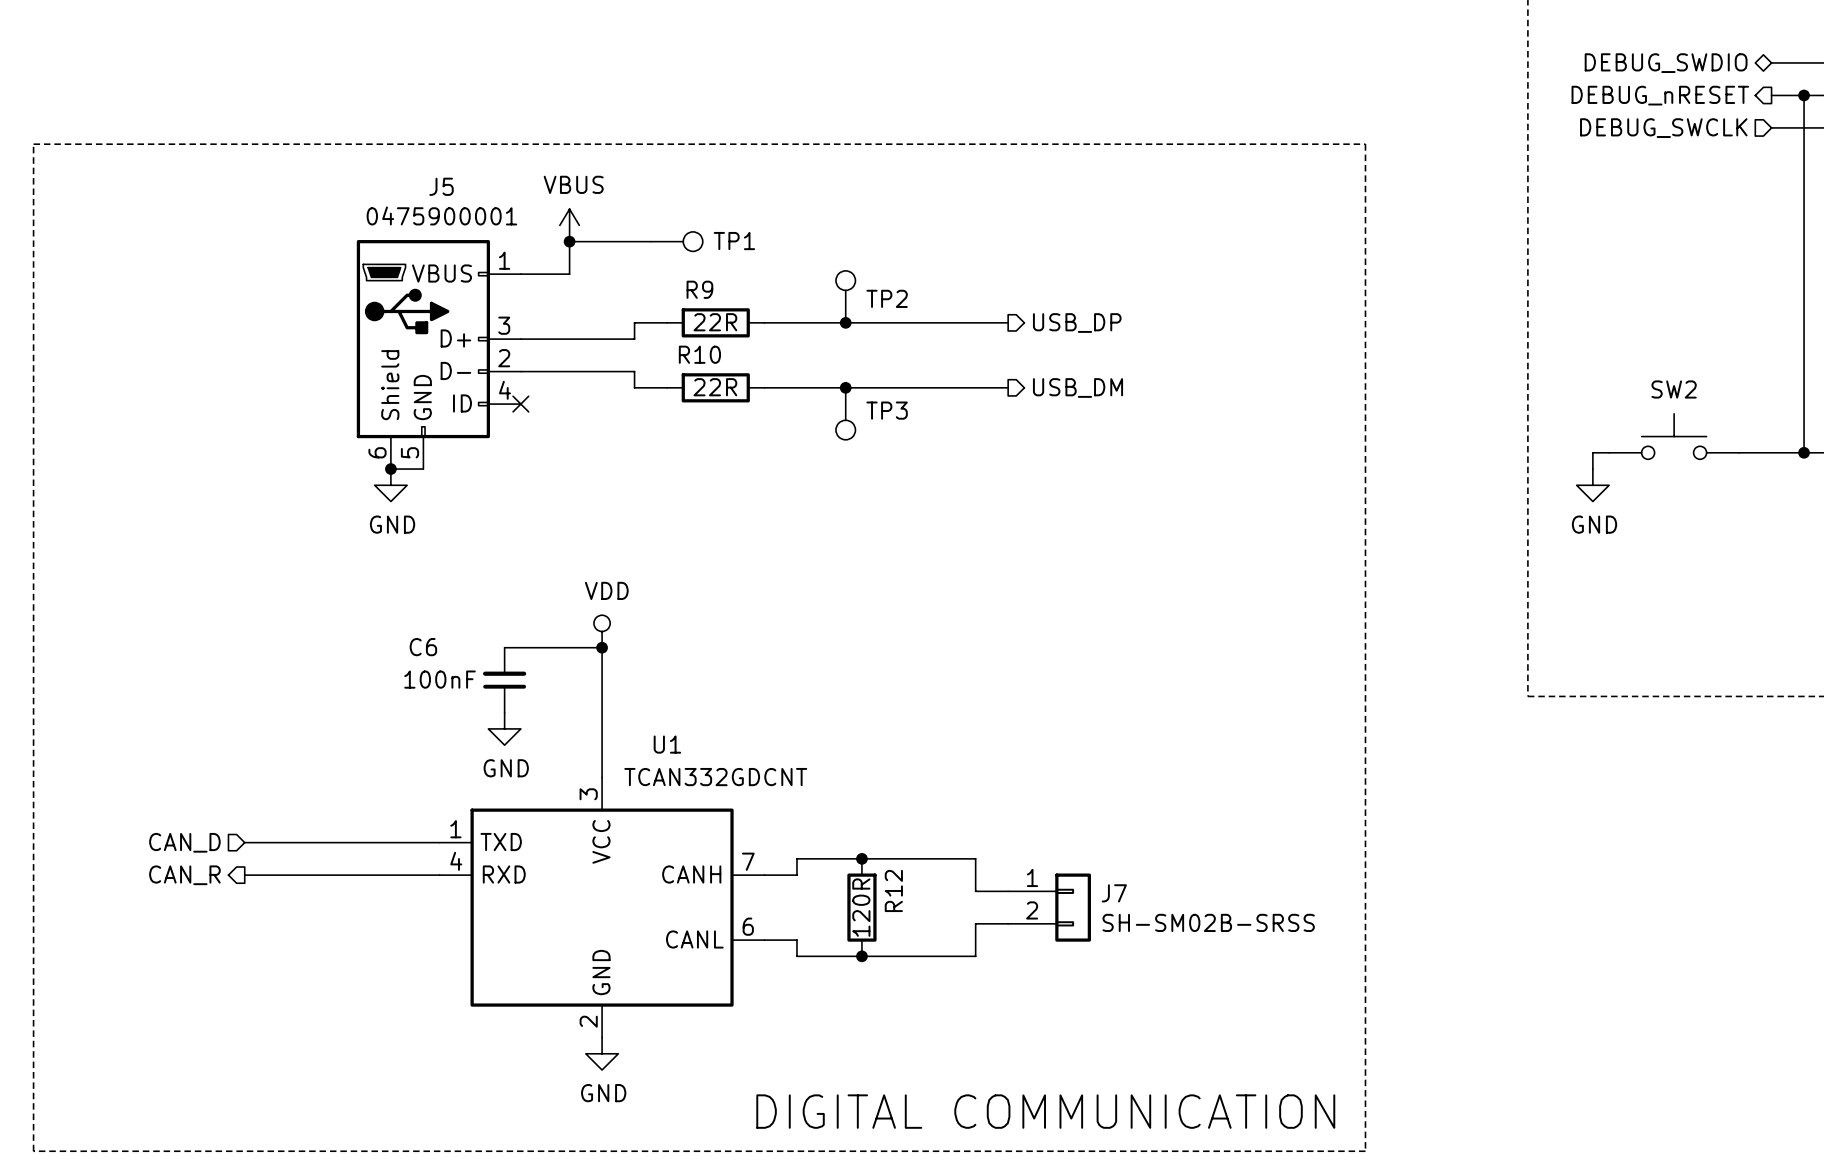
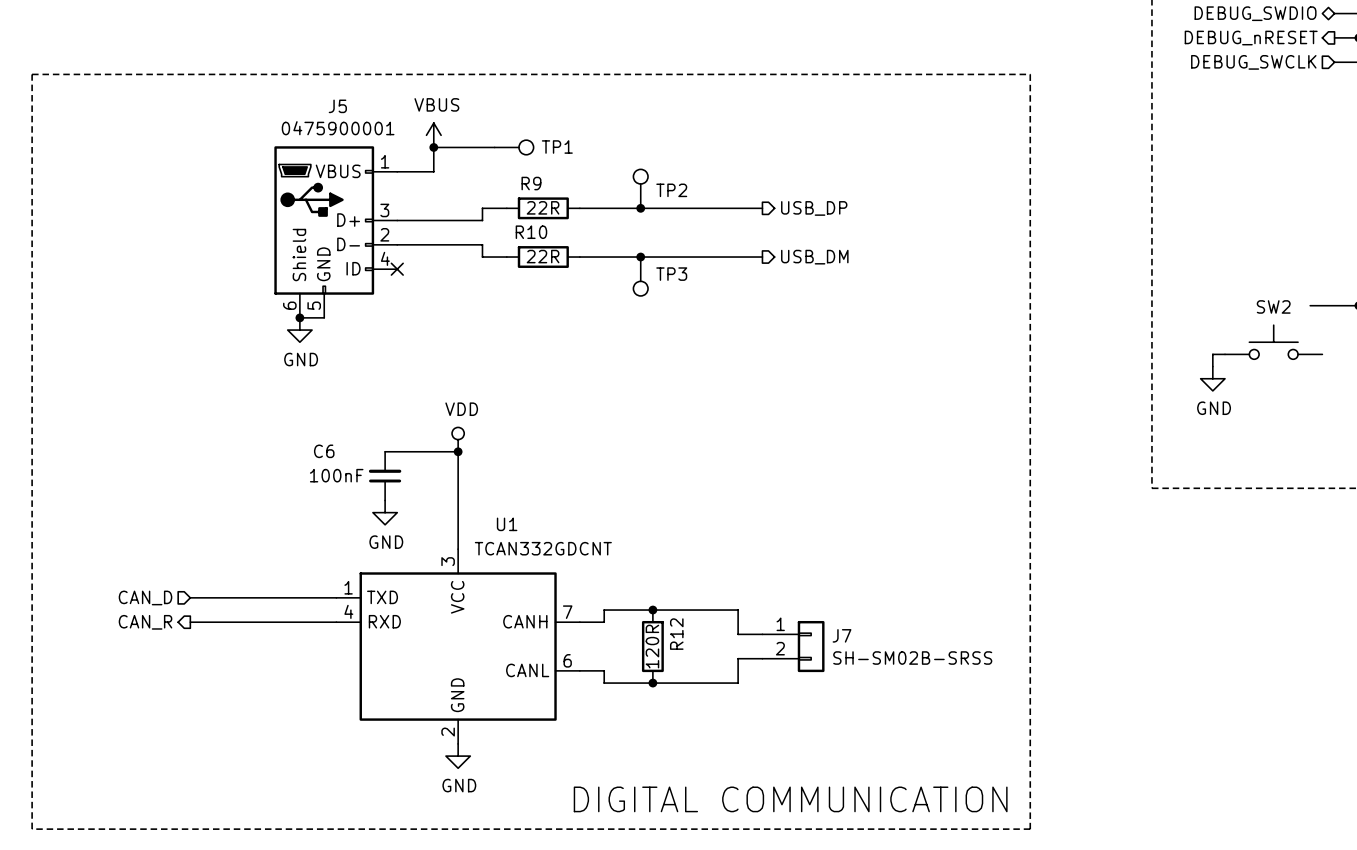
SW2 position: (1674, 436) -> (1273, 342)
wire: (1609, 452) (1592, 452) (1592, 469) -> (1225, 354) (1212, 354) (1212, 366)
power symbol position: GND (1592, 485) -> GND (1212, 378)

